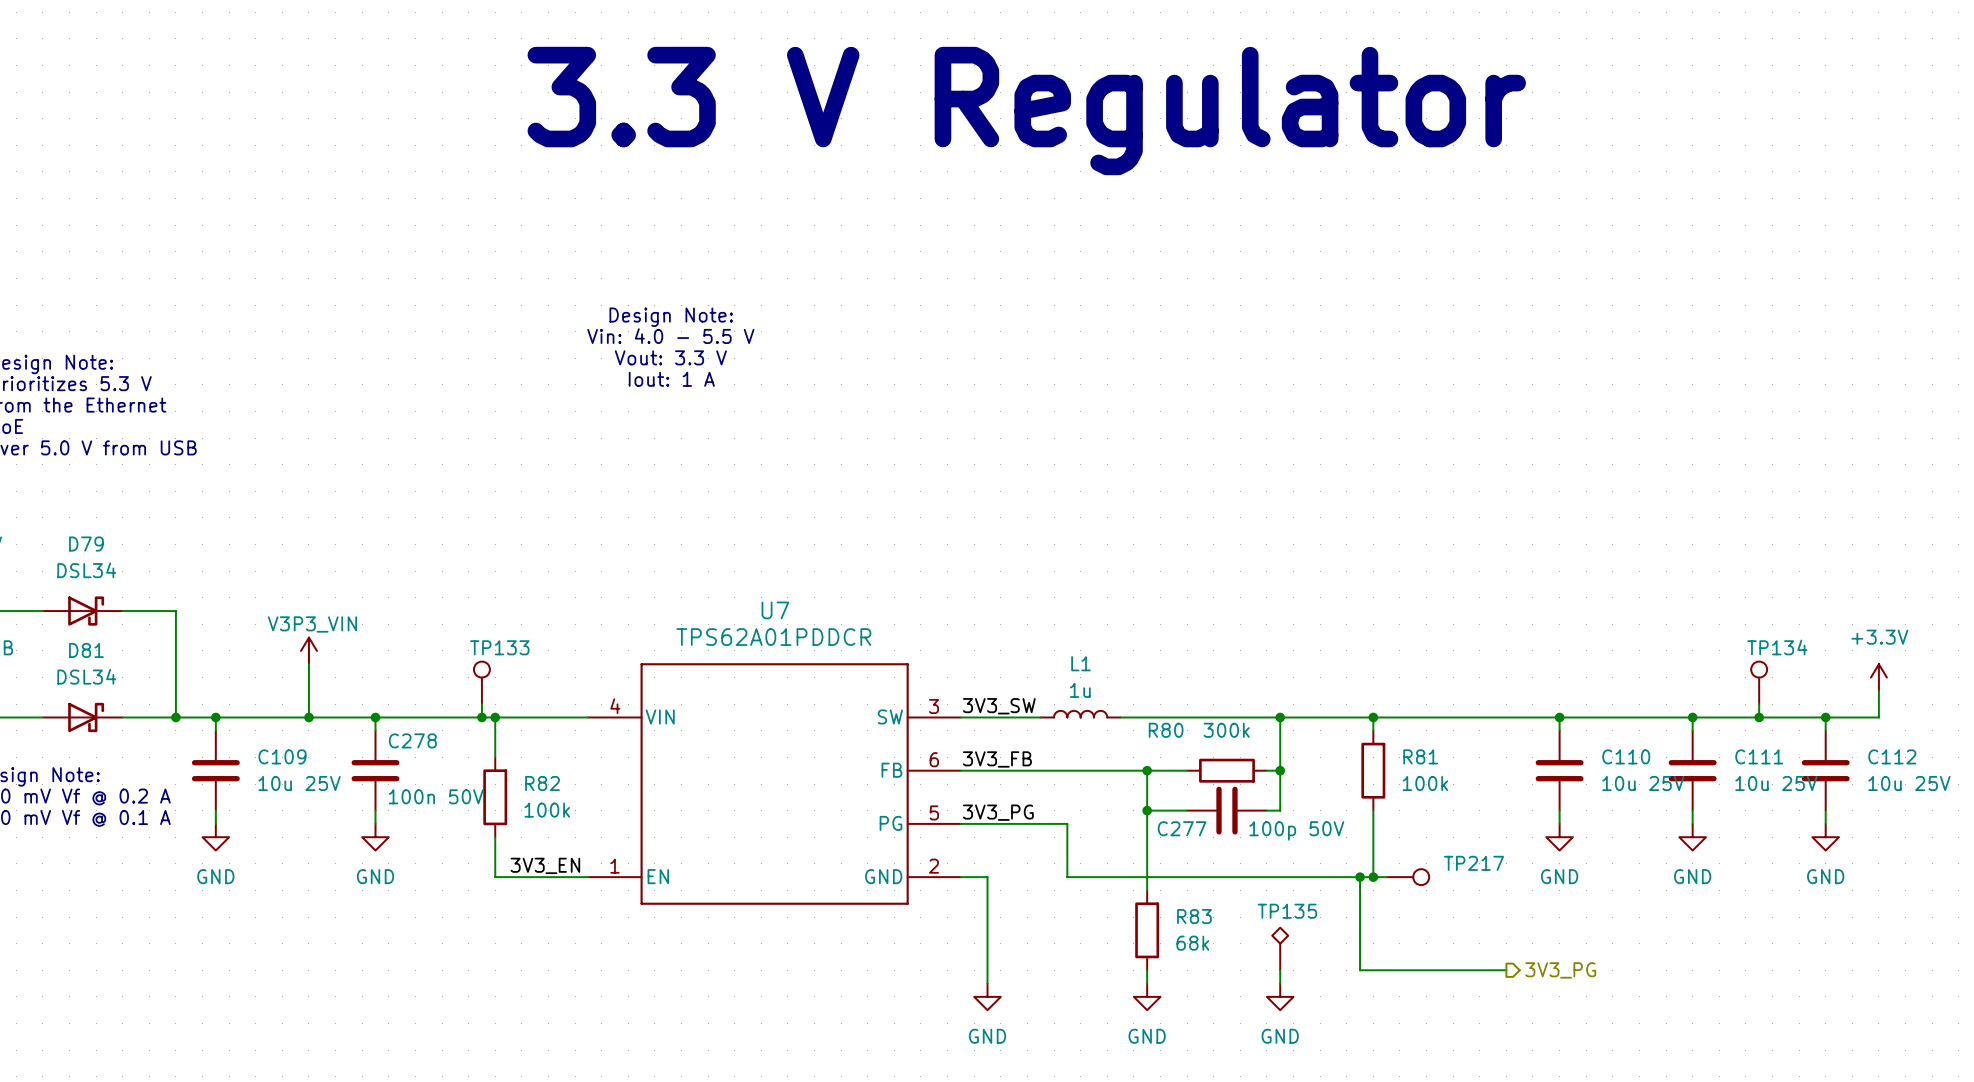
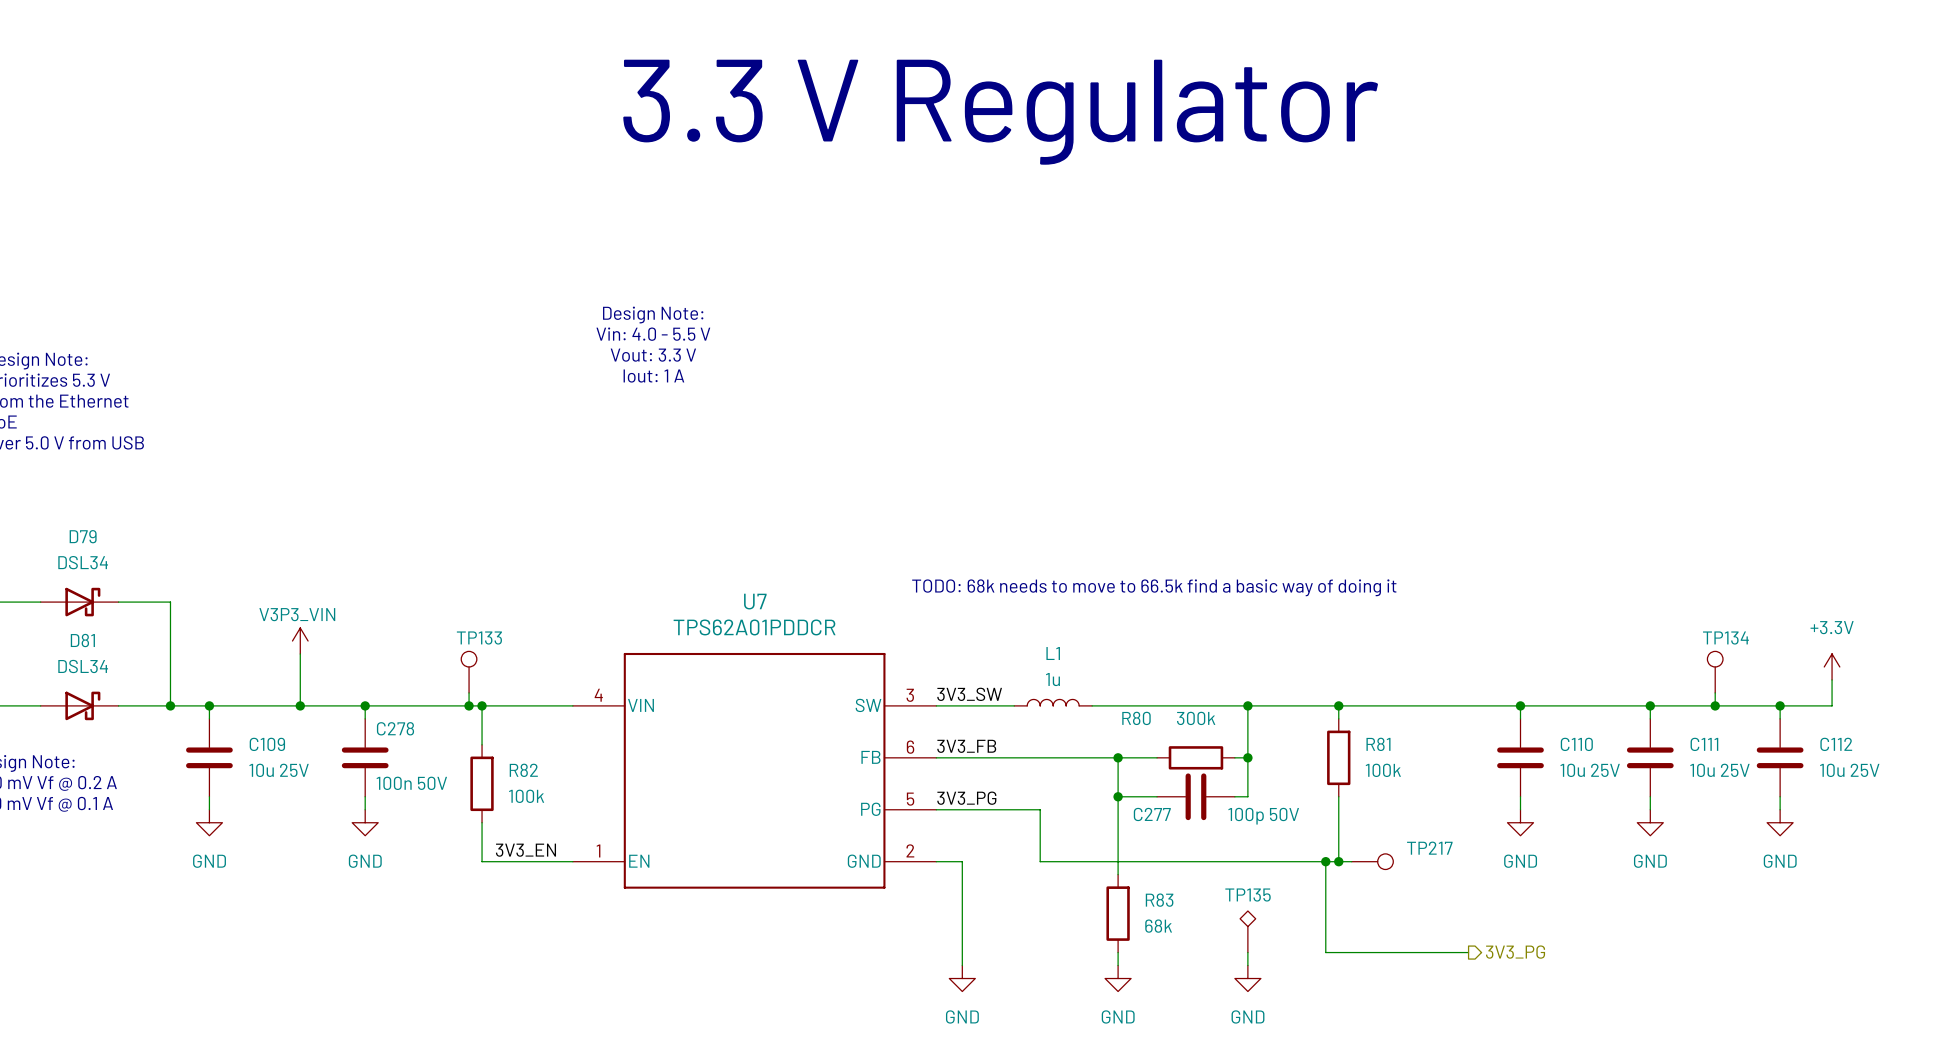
text: none -> TODO: 68k needs to move to 66.5k find a basic way of doing it (1154, 587)

